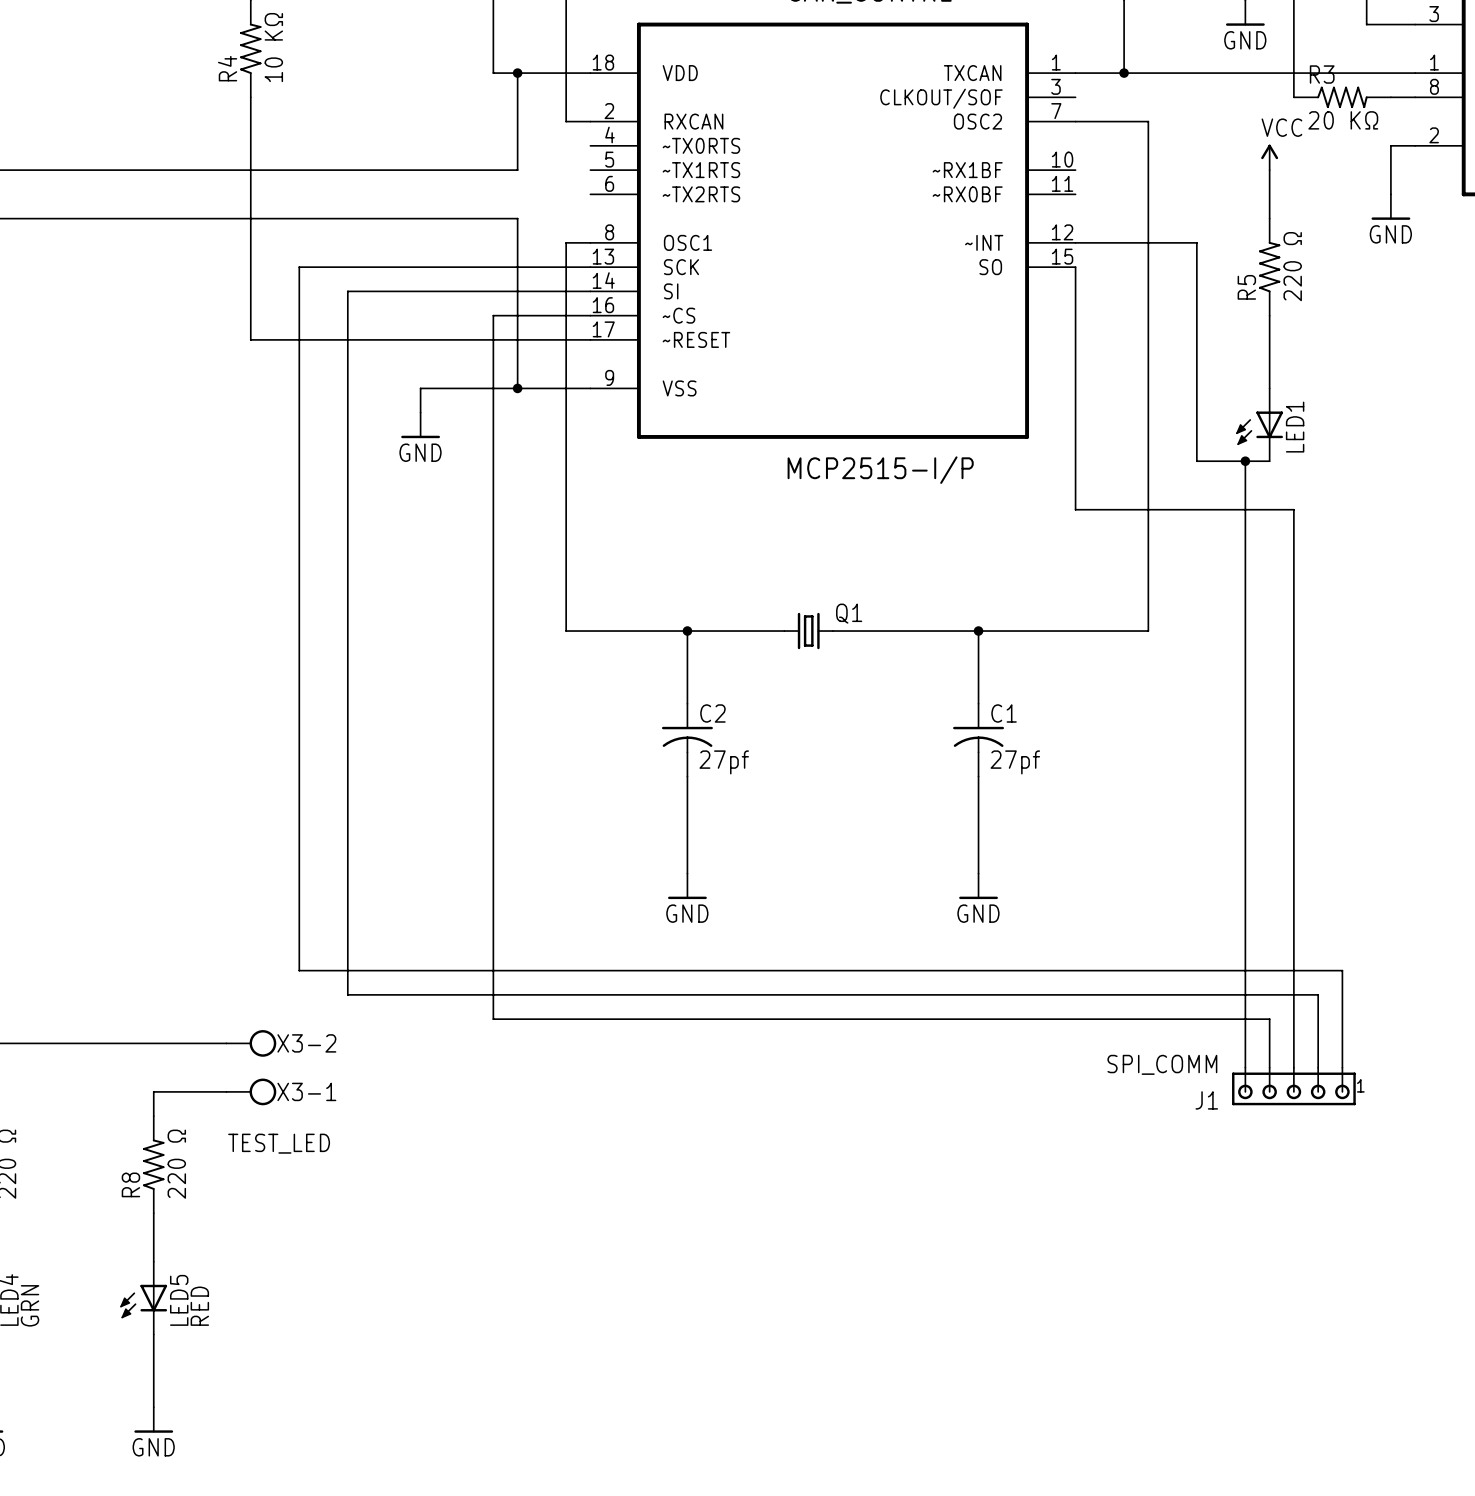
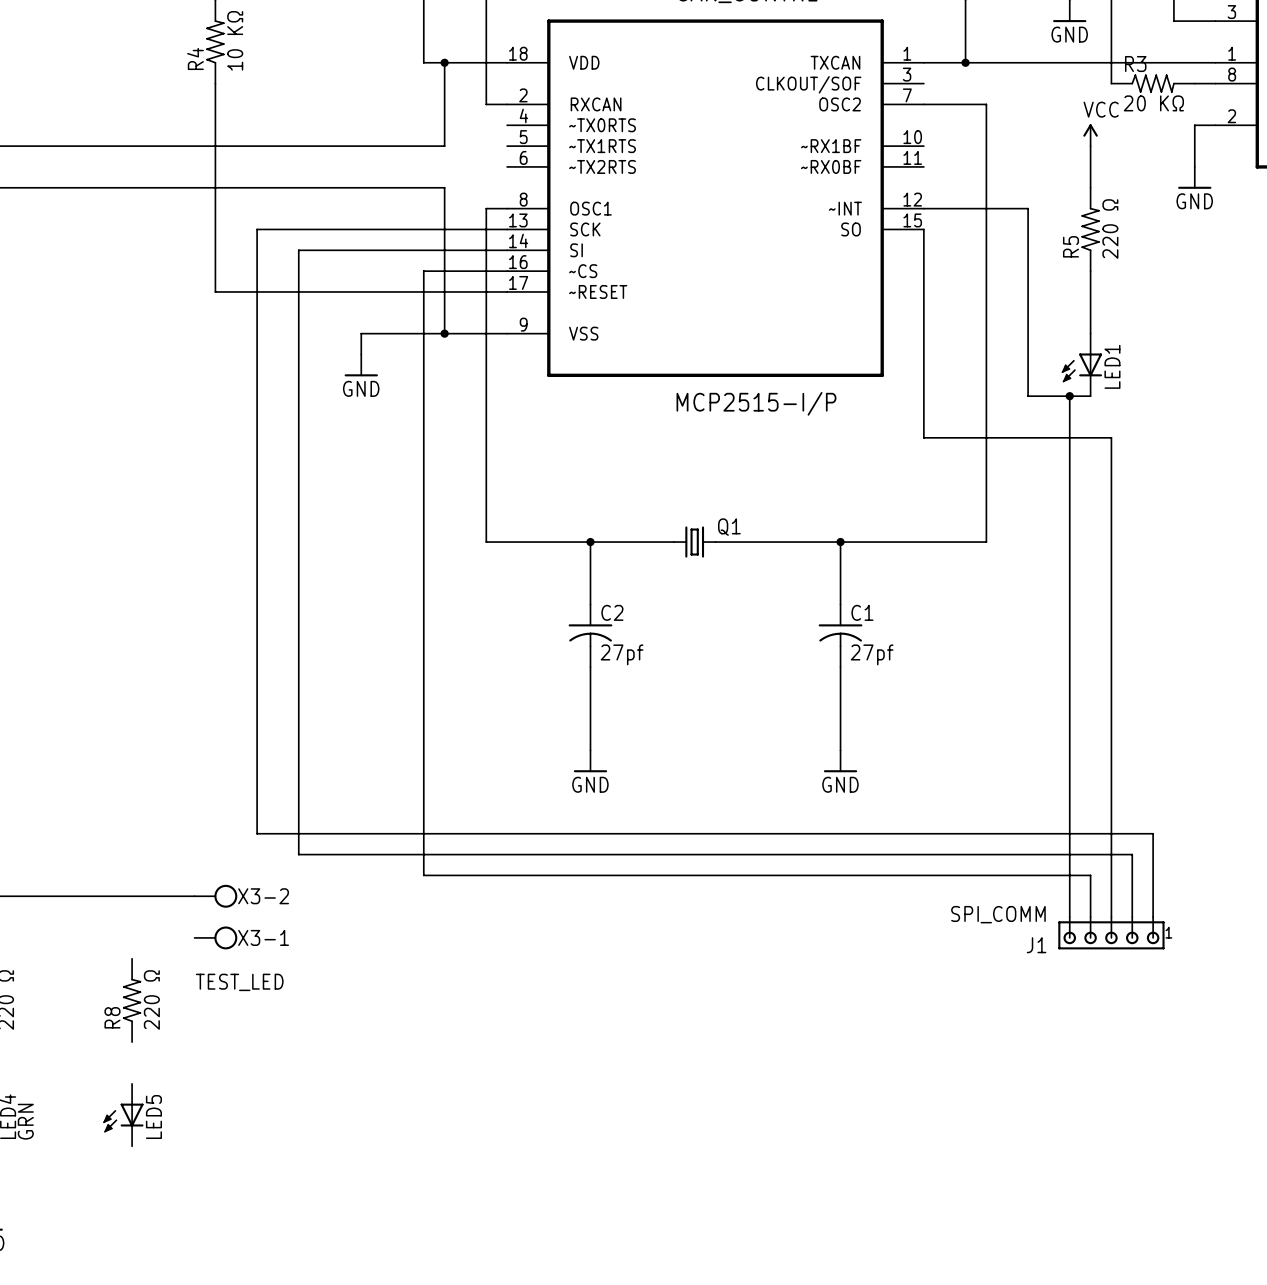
wire: (226, 1091) (153, 1091) (153, 1116) -> none
wire: (153, 1213) (153, 1261) -> none
LED5 value: RED (199, 1306) -> none
wire: (153, 1334) (153, 1407) -> none
power symbol: GND (153, 1420) -> none

